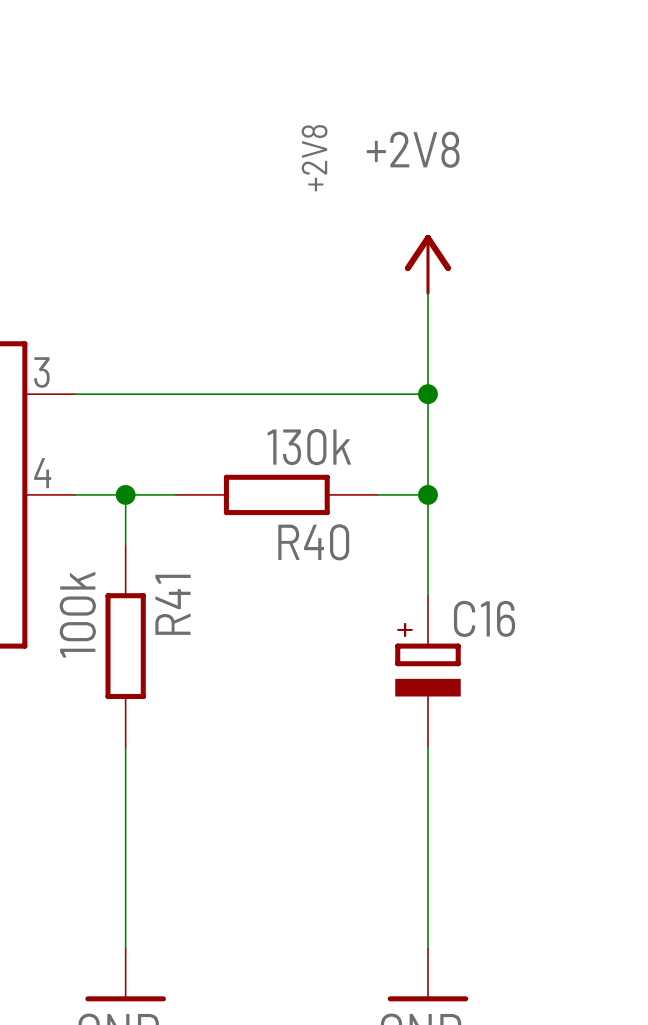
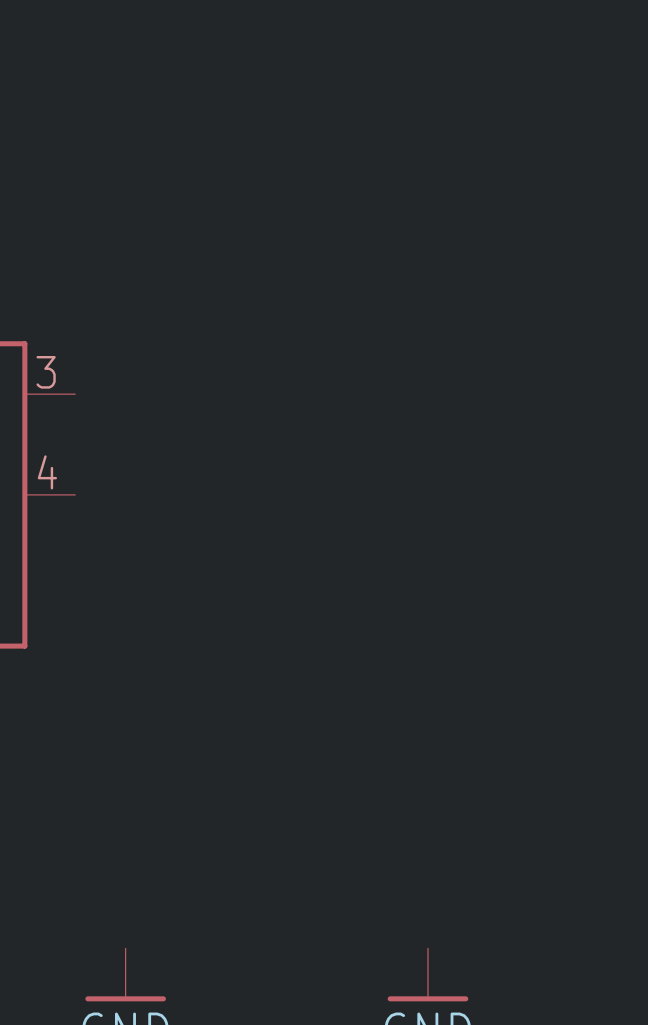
label: +2V8 (314, 158) -> none
power symbol: +2V8 (427, 264) -> none
wire: (427, 293) (427, 595) -> none
wire: (75, 394) (427, 394) -> none
junction: (427, 394) -> none
wire: (75, 494) (176, 494) -> none
wire: (125, 494) (125, 545) -> none
junction: (125, 494) -> none
R40: 130k (276, 494) -> none
wire: (377, 494) (427, 494) -> none
junction: (427, 494) -> none
R41: 100k (125, 646) -> none
C16: (427, 671) -> none
wire: (125, 746) (125, 948) -> none
wire: (427, 746) (427, 948) -> none

